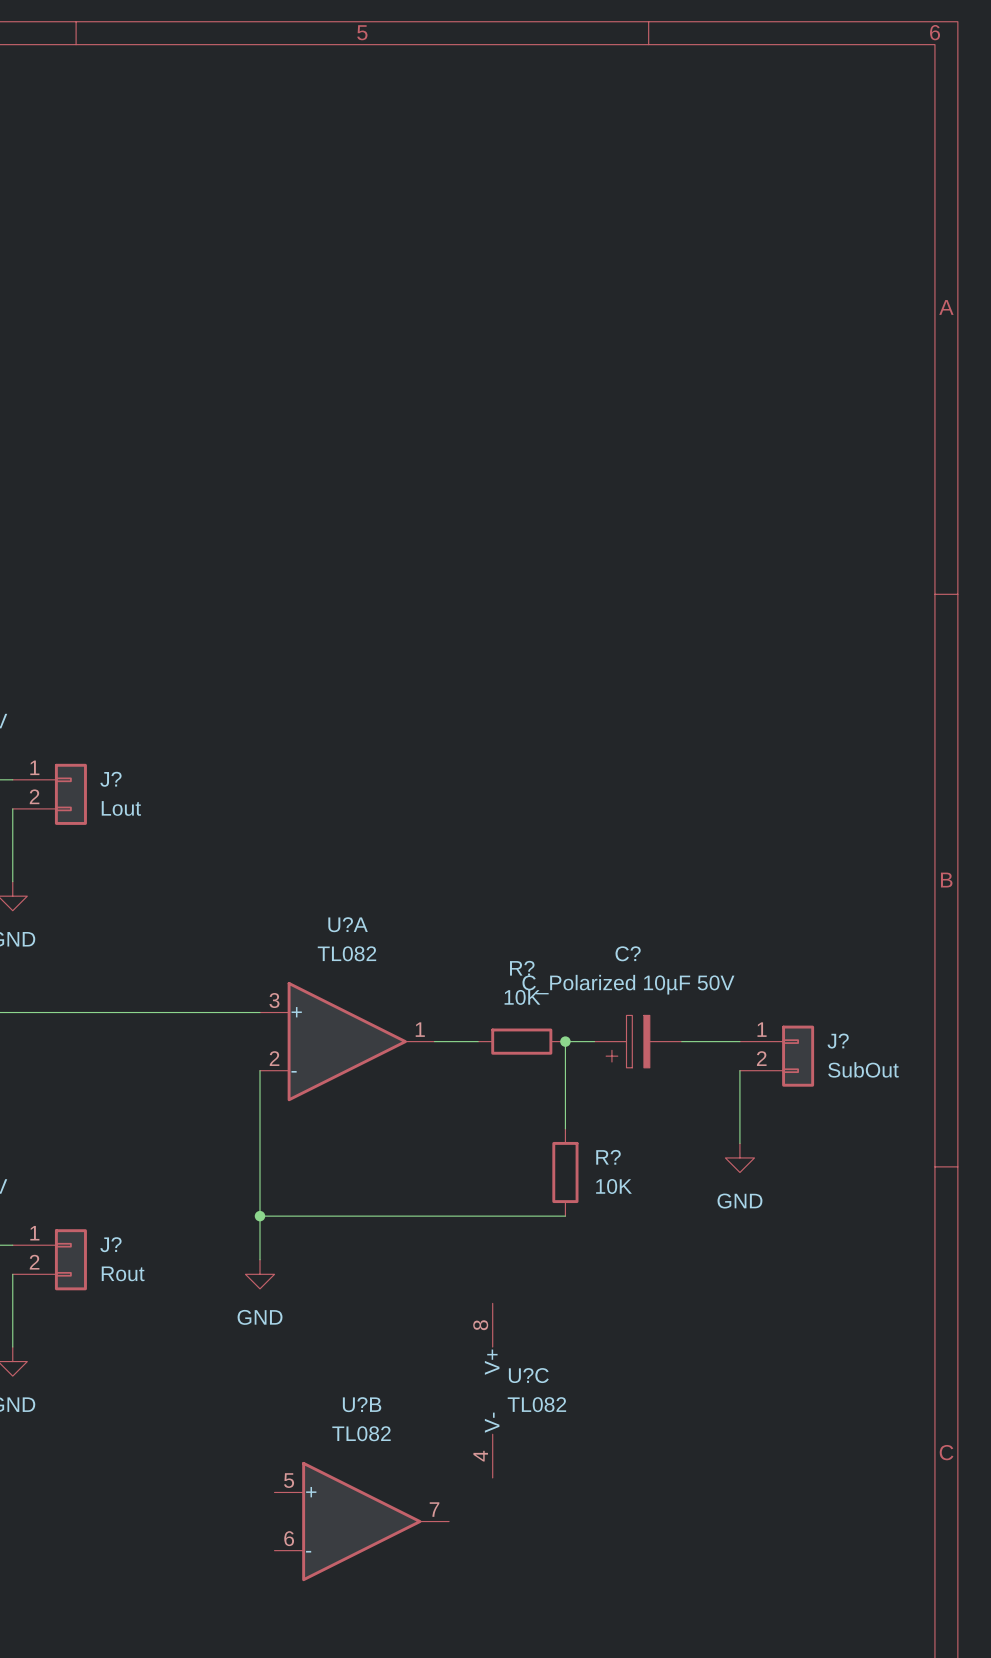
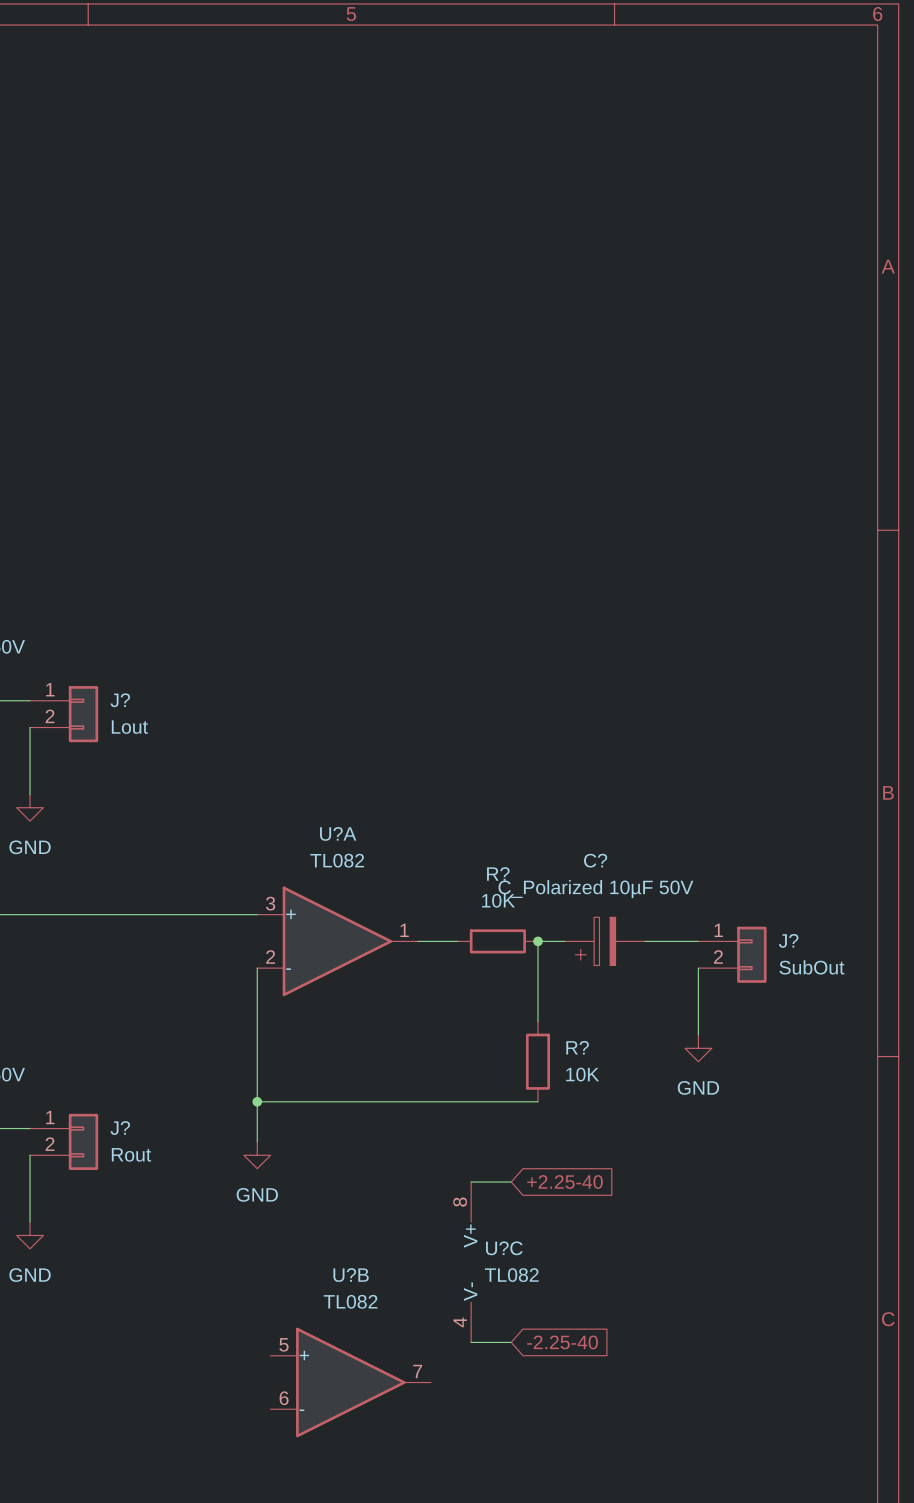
wire: none -> (471, 1182) (511, 1182)
global label: none -> +2.25-40 (565, 1182)
wire: none -> (471, 1342) (511, 1342)
global label: none -> -2.25-40 (562, 1342)

